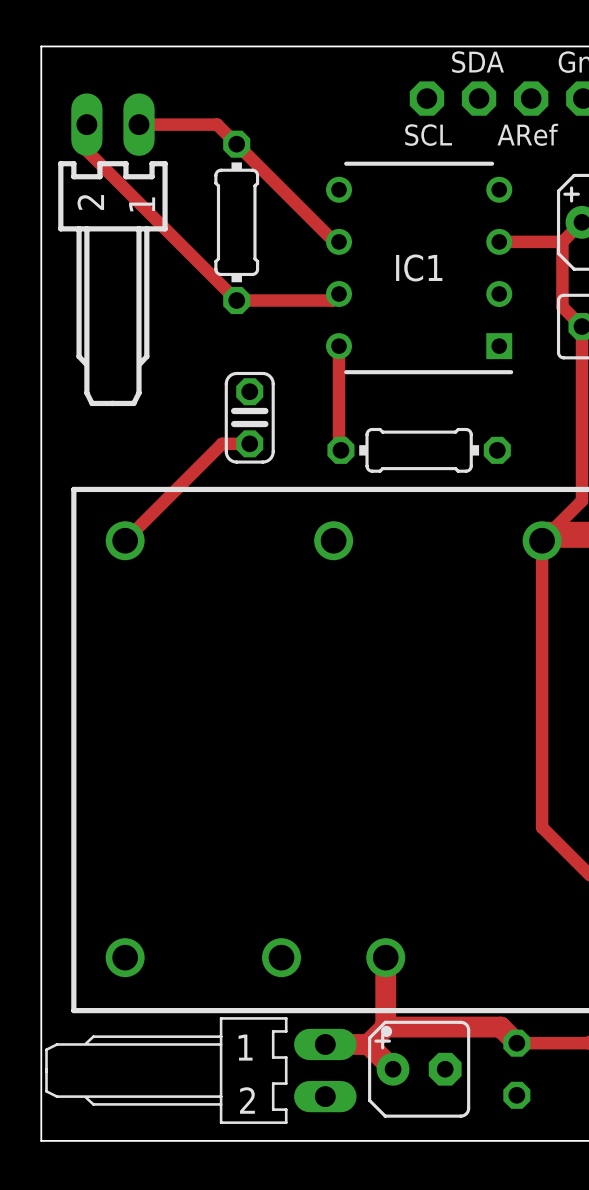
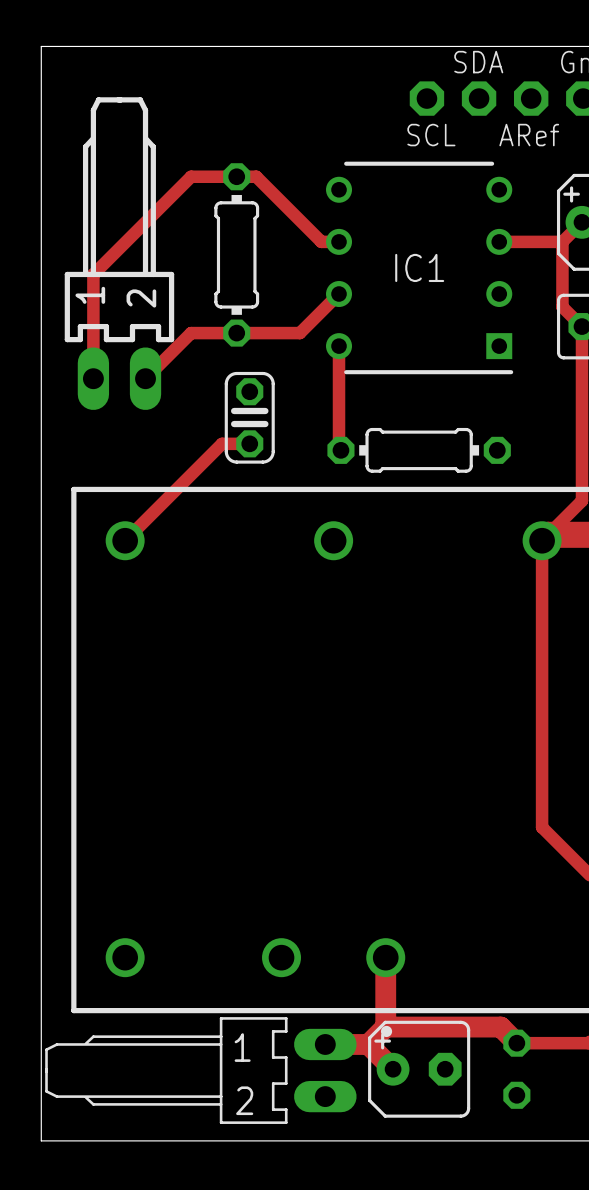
part footprint: [58, 93, 168, 407] -> [64, 97, 175, 410]
track: (86, 124) (86, 150) (236, 300) (332, 300) -> (145, 378) (191, 333) (299, 333) (332, 300)
track: (139, 124) (217, 124) (334, 241) -> (93, 378) (93, 274) (191, 176) (256, 176) (321, 241) (334, 241)
part position: (236, 222) -> (236, 254)

